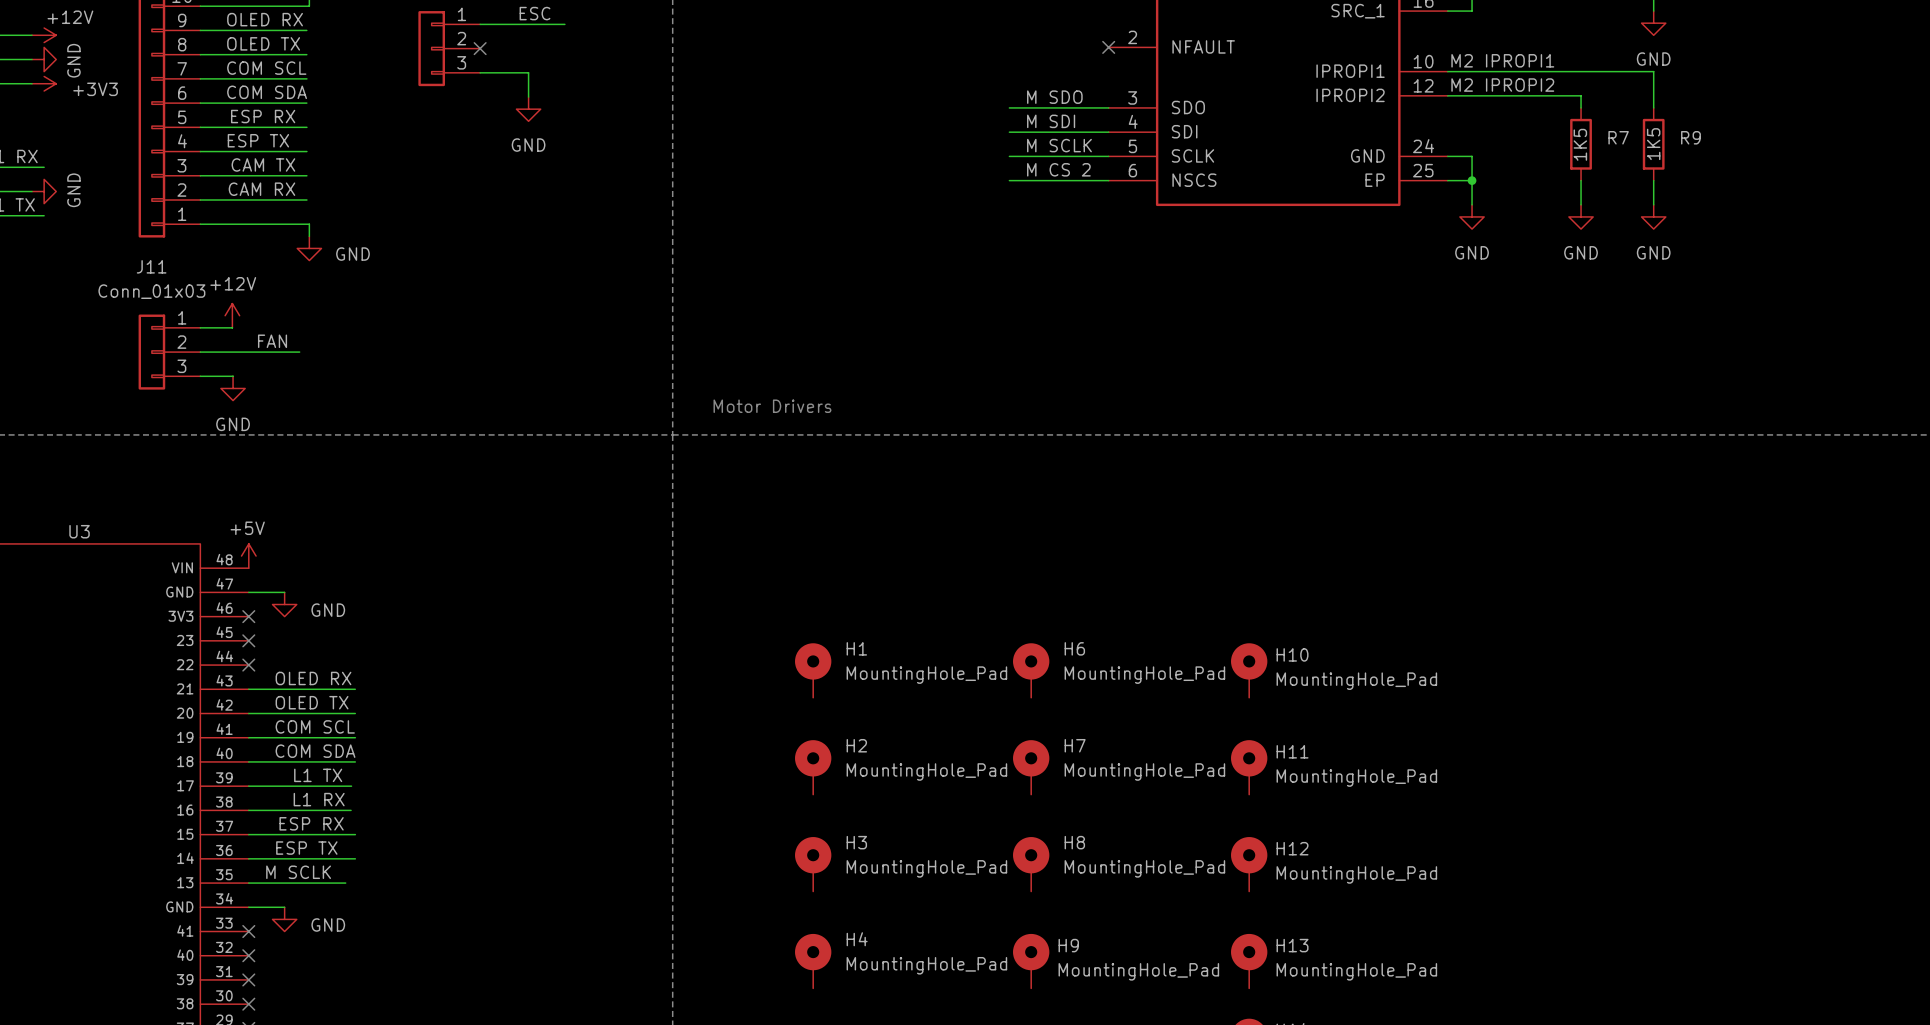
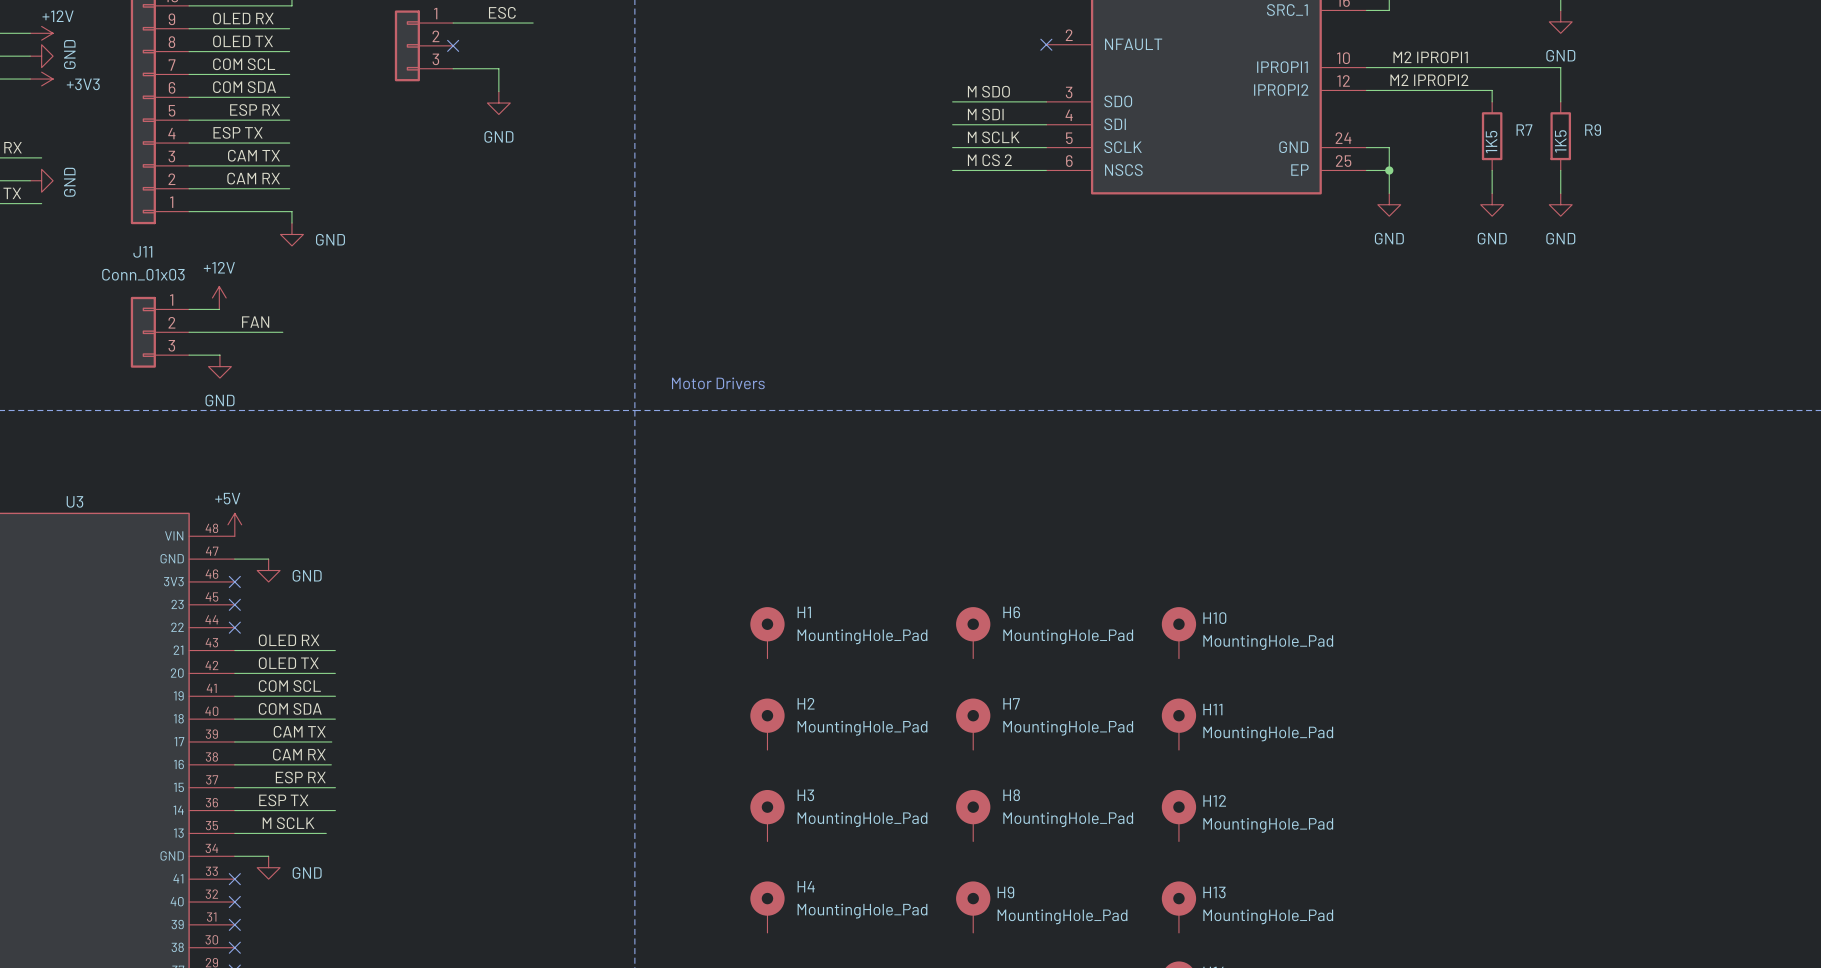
label: none -> CAM TX (299, 731)
label: L1 TX (318, 775) -> none
label: none -> CAM RX (299, 754)
label: L1 RX (319, 799) -> none

